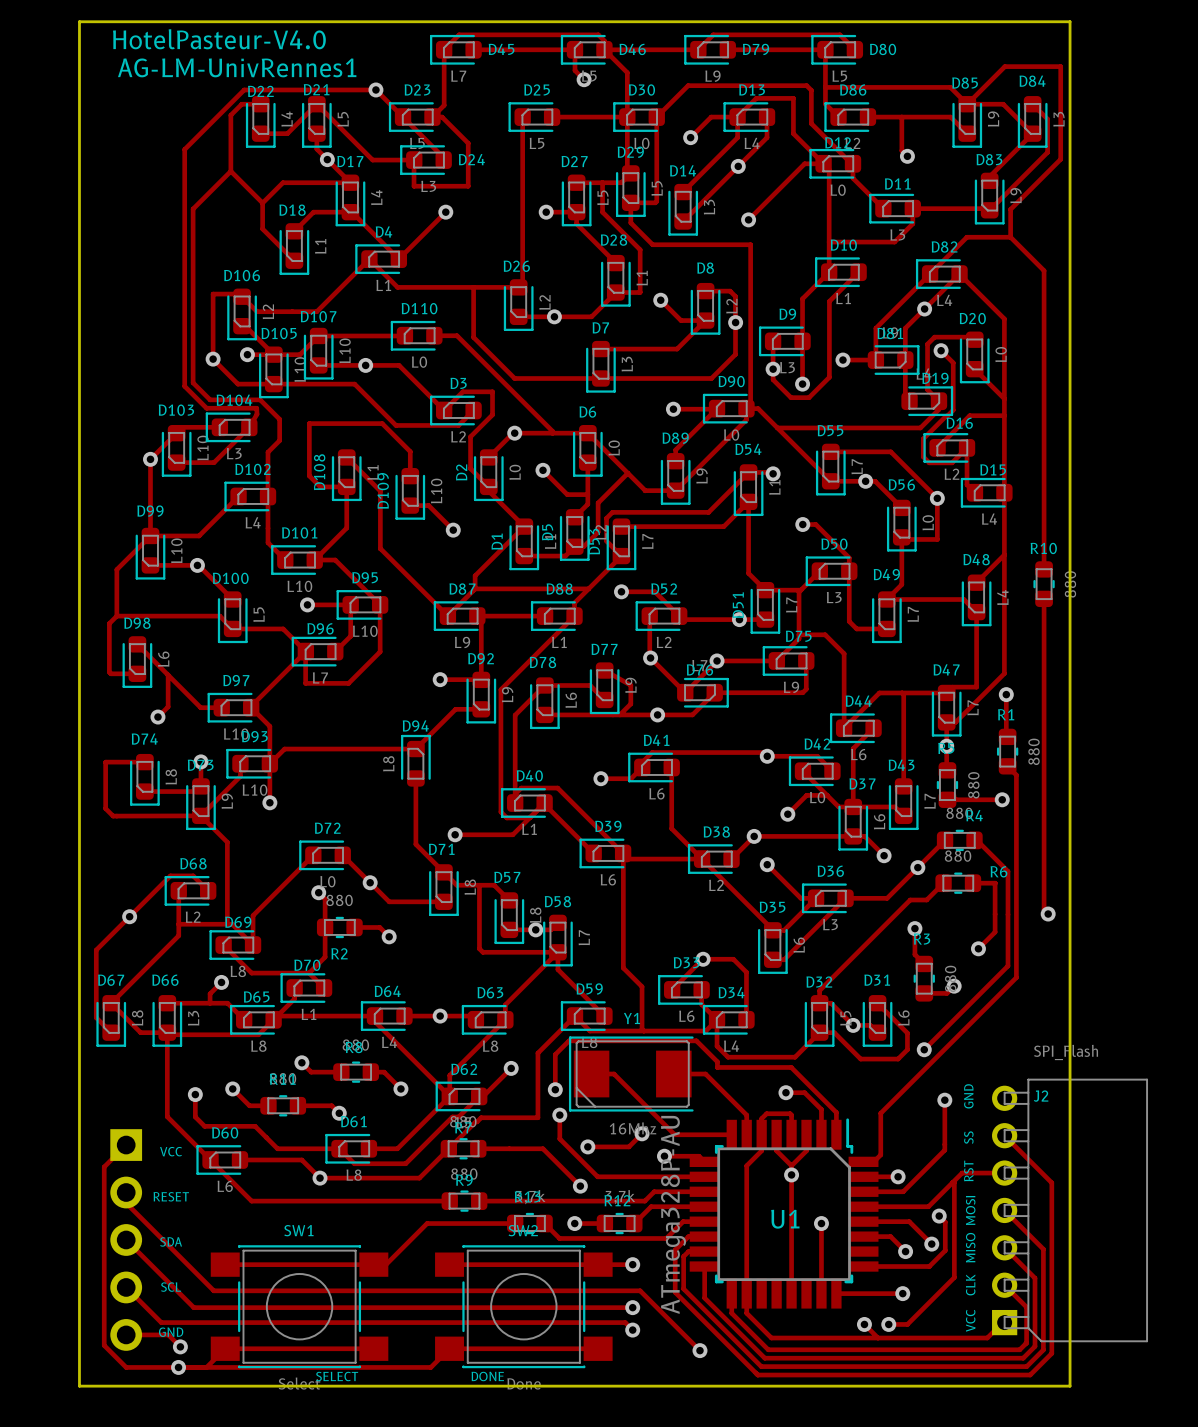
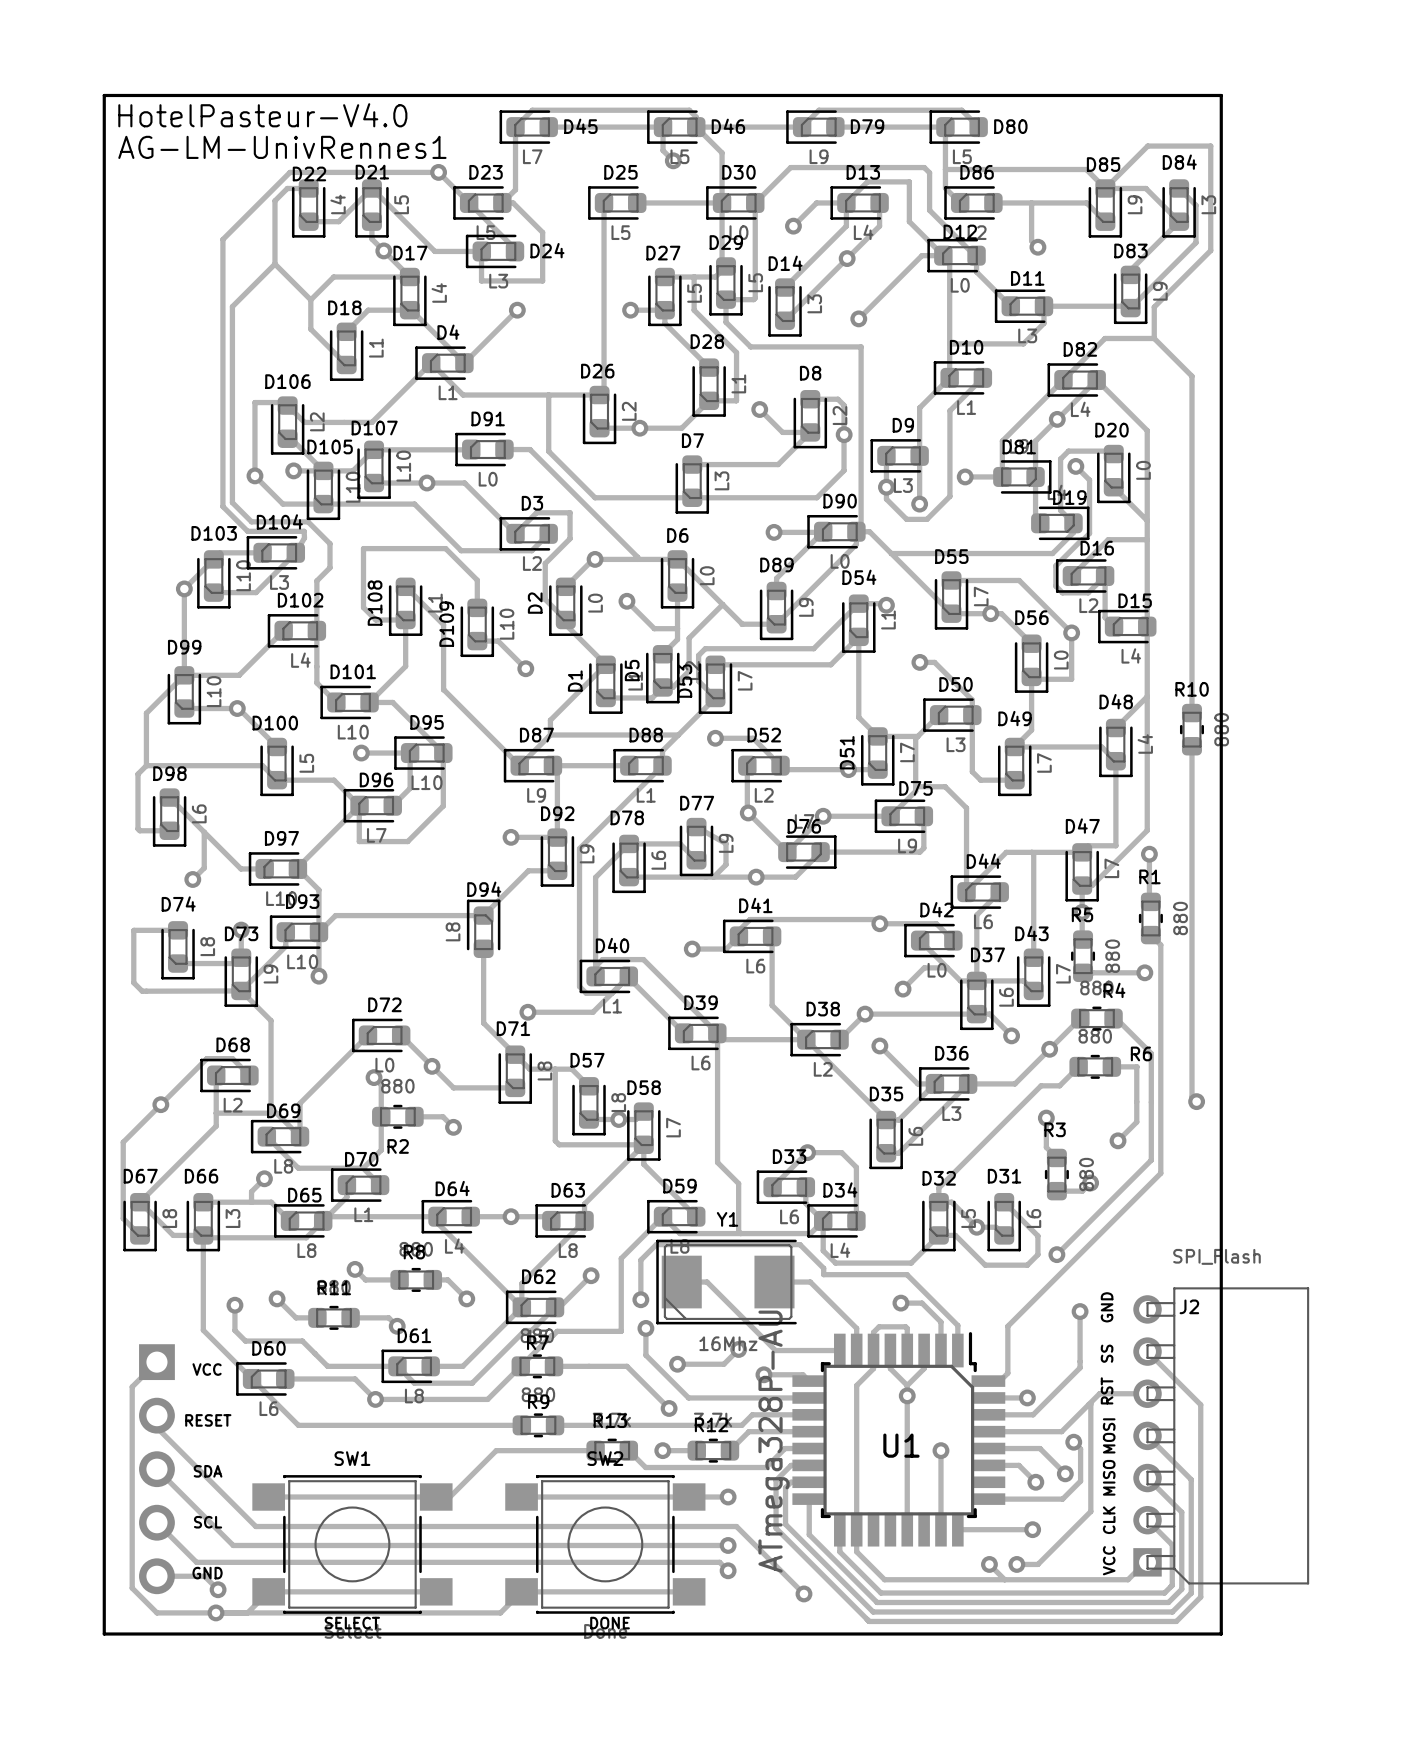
D110 name: D110 (419, 308) -> D91 (488, 418)

